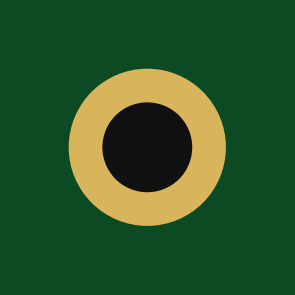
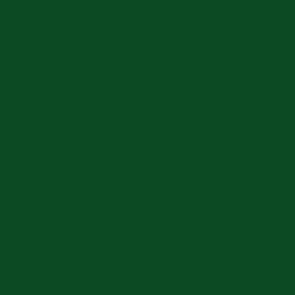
part: (147, 147) -> none

